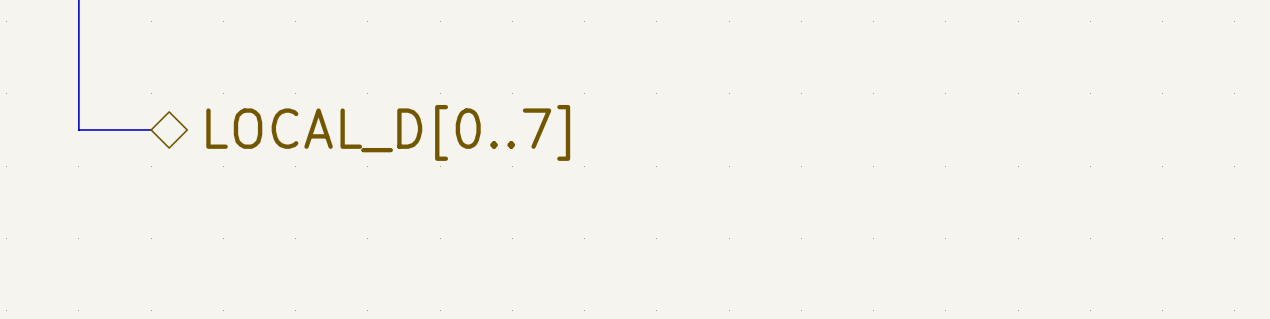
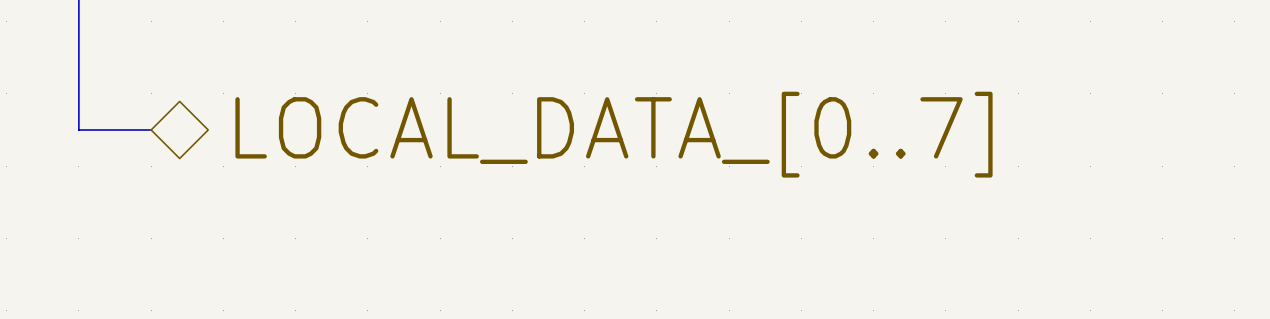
hierarchical label: LOCAL_D[0..7] (388, 132) -> LOCAL_DATA_[0..7] (613, 134)

